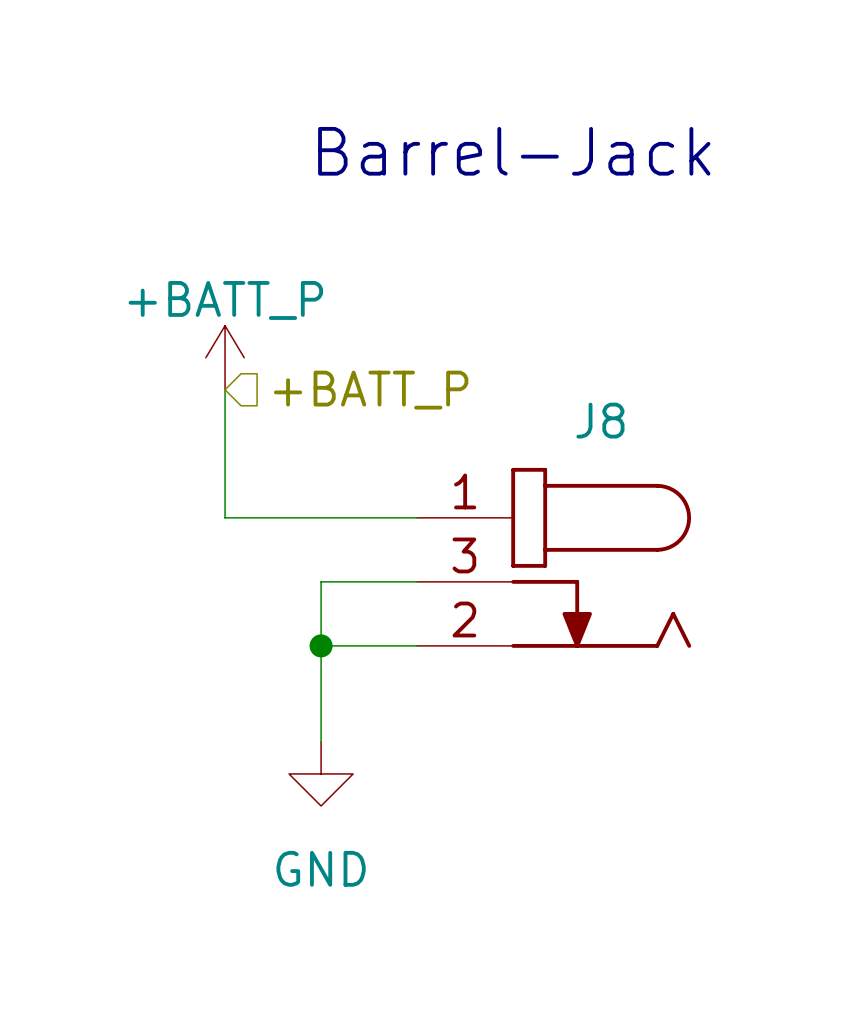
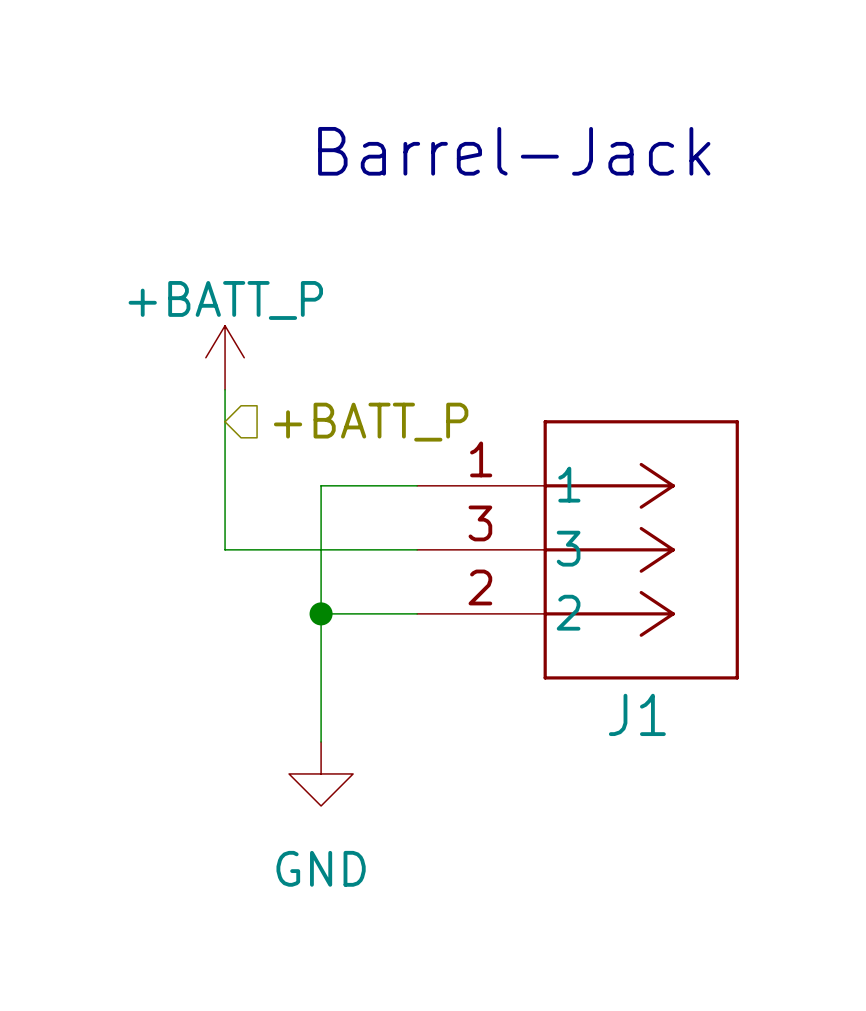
hierarchical label position: +BATT_P (371, 390) -> +BATT_P (371, 422)
wire: (225, 517) (417, 517) -> (225, 517) (225, 549) (417, 549)
J1: none -> (578, 549)
J8: (554, 557) -> none
wire: (321, 581) (417, 581) -> (321, 581) (321, 485) (417, 485)
wire: (321, 645) (417, 645) -> (321, 613) (417, 613)
junction position: (321, 645) -> (321, 613)

